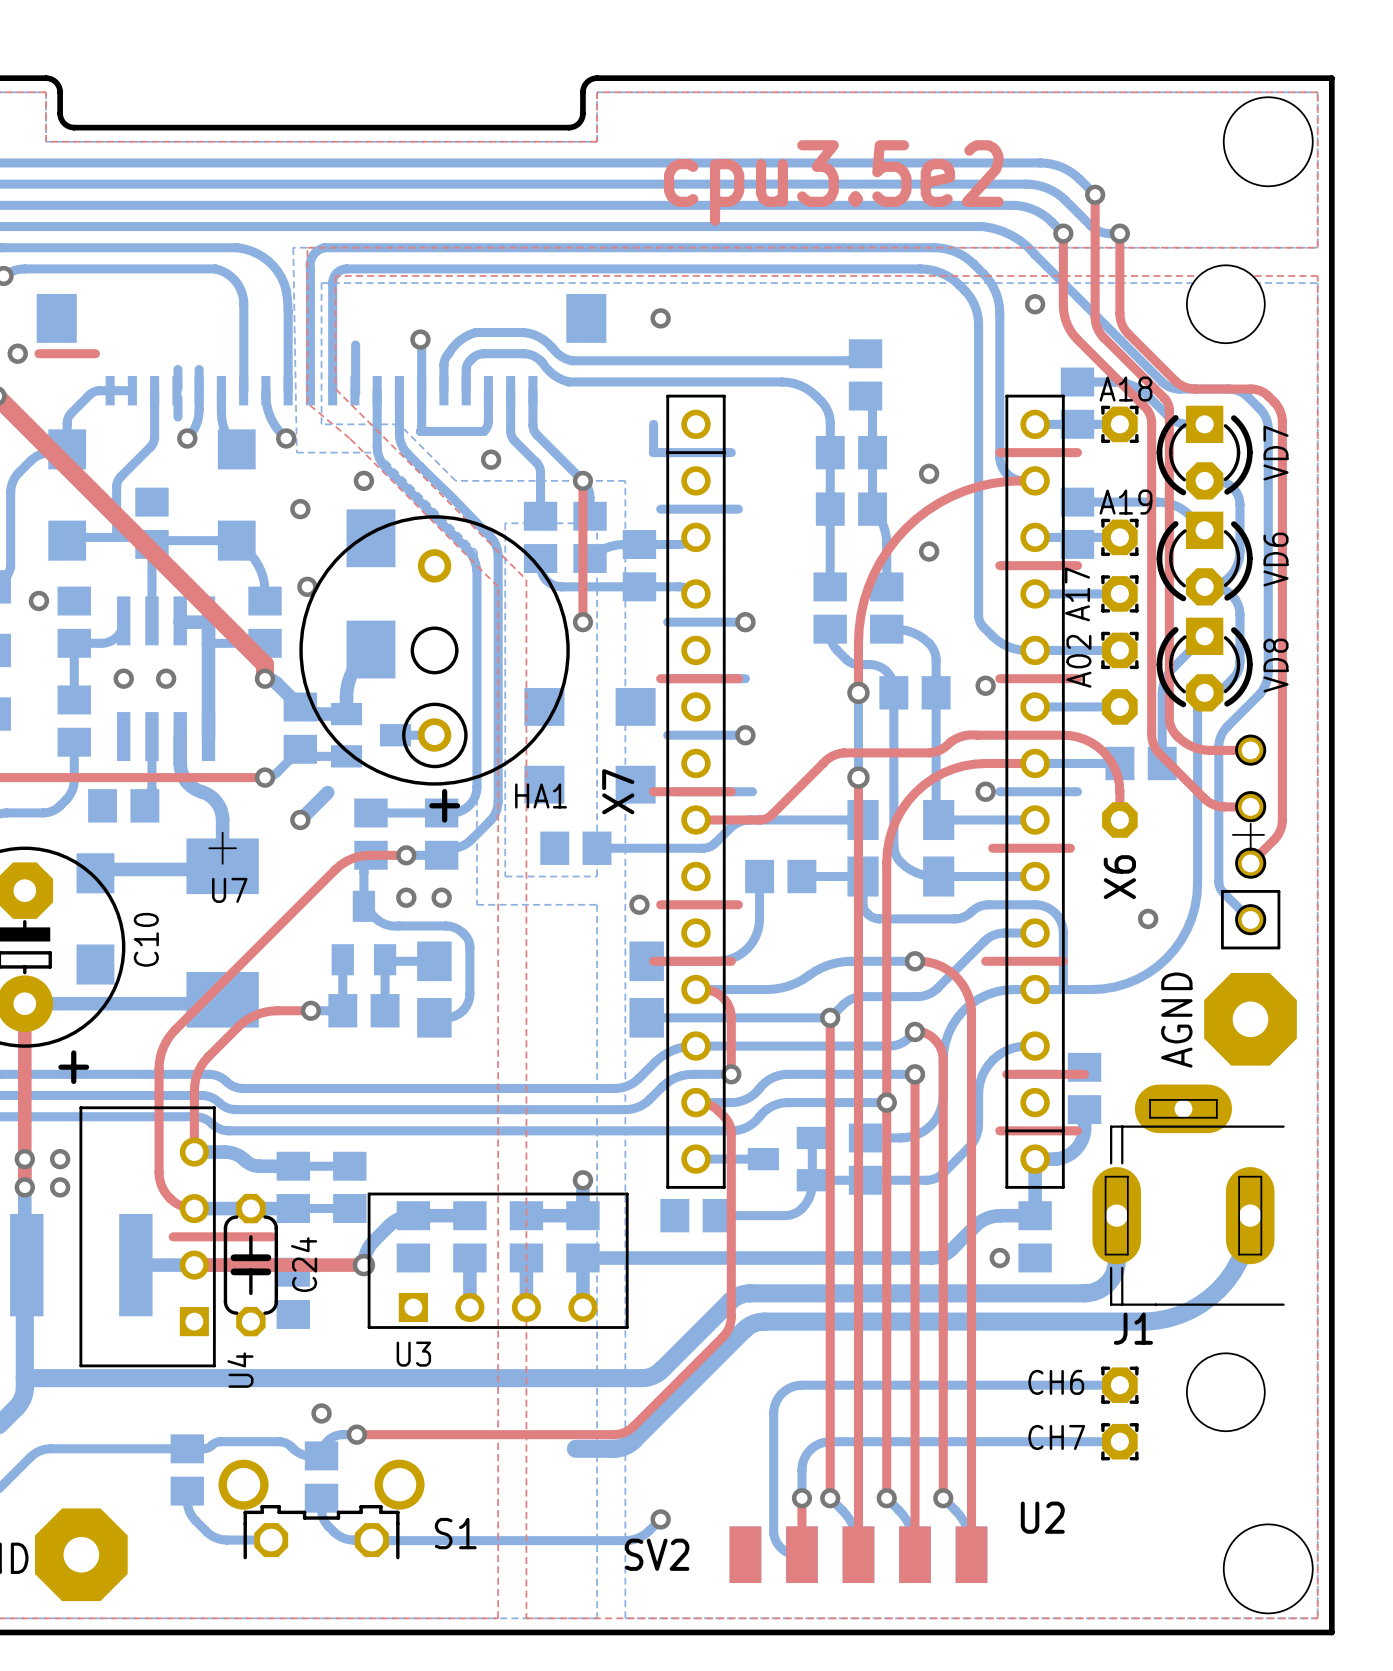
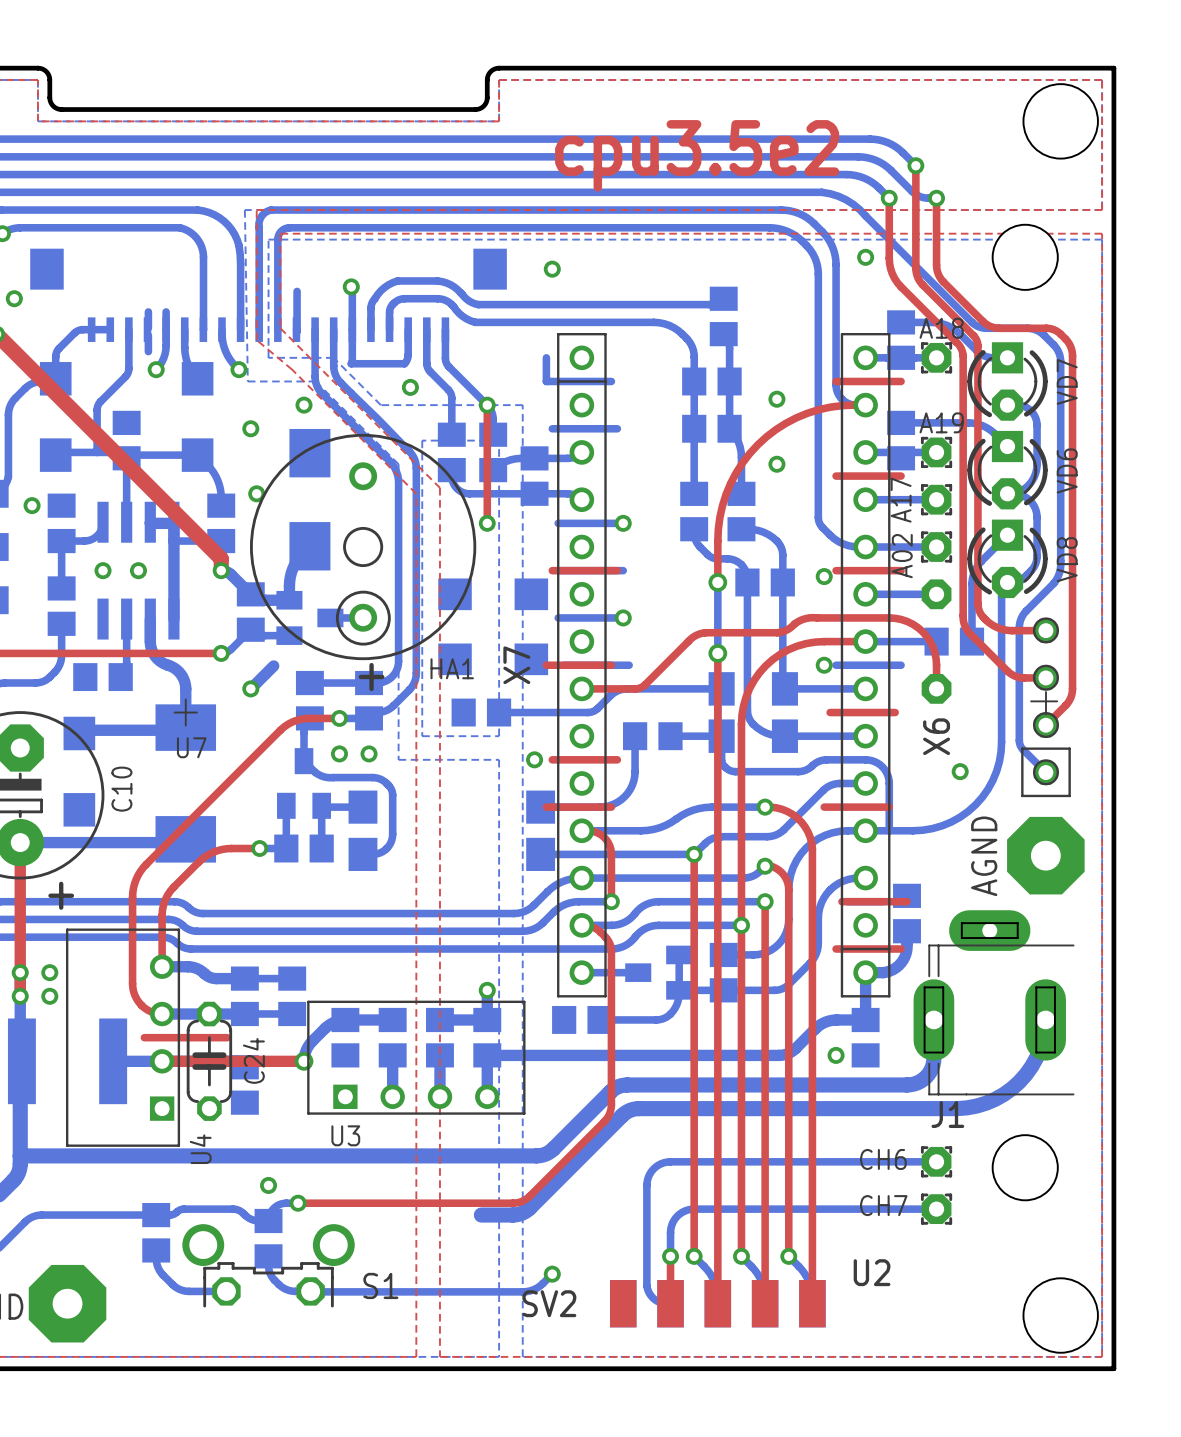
top track: (38, 353) (95, 353) -> none

